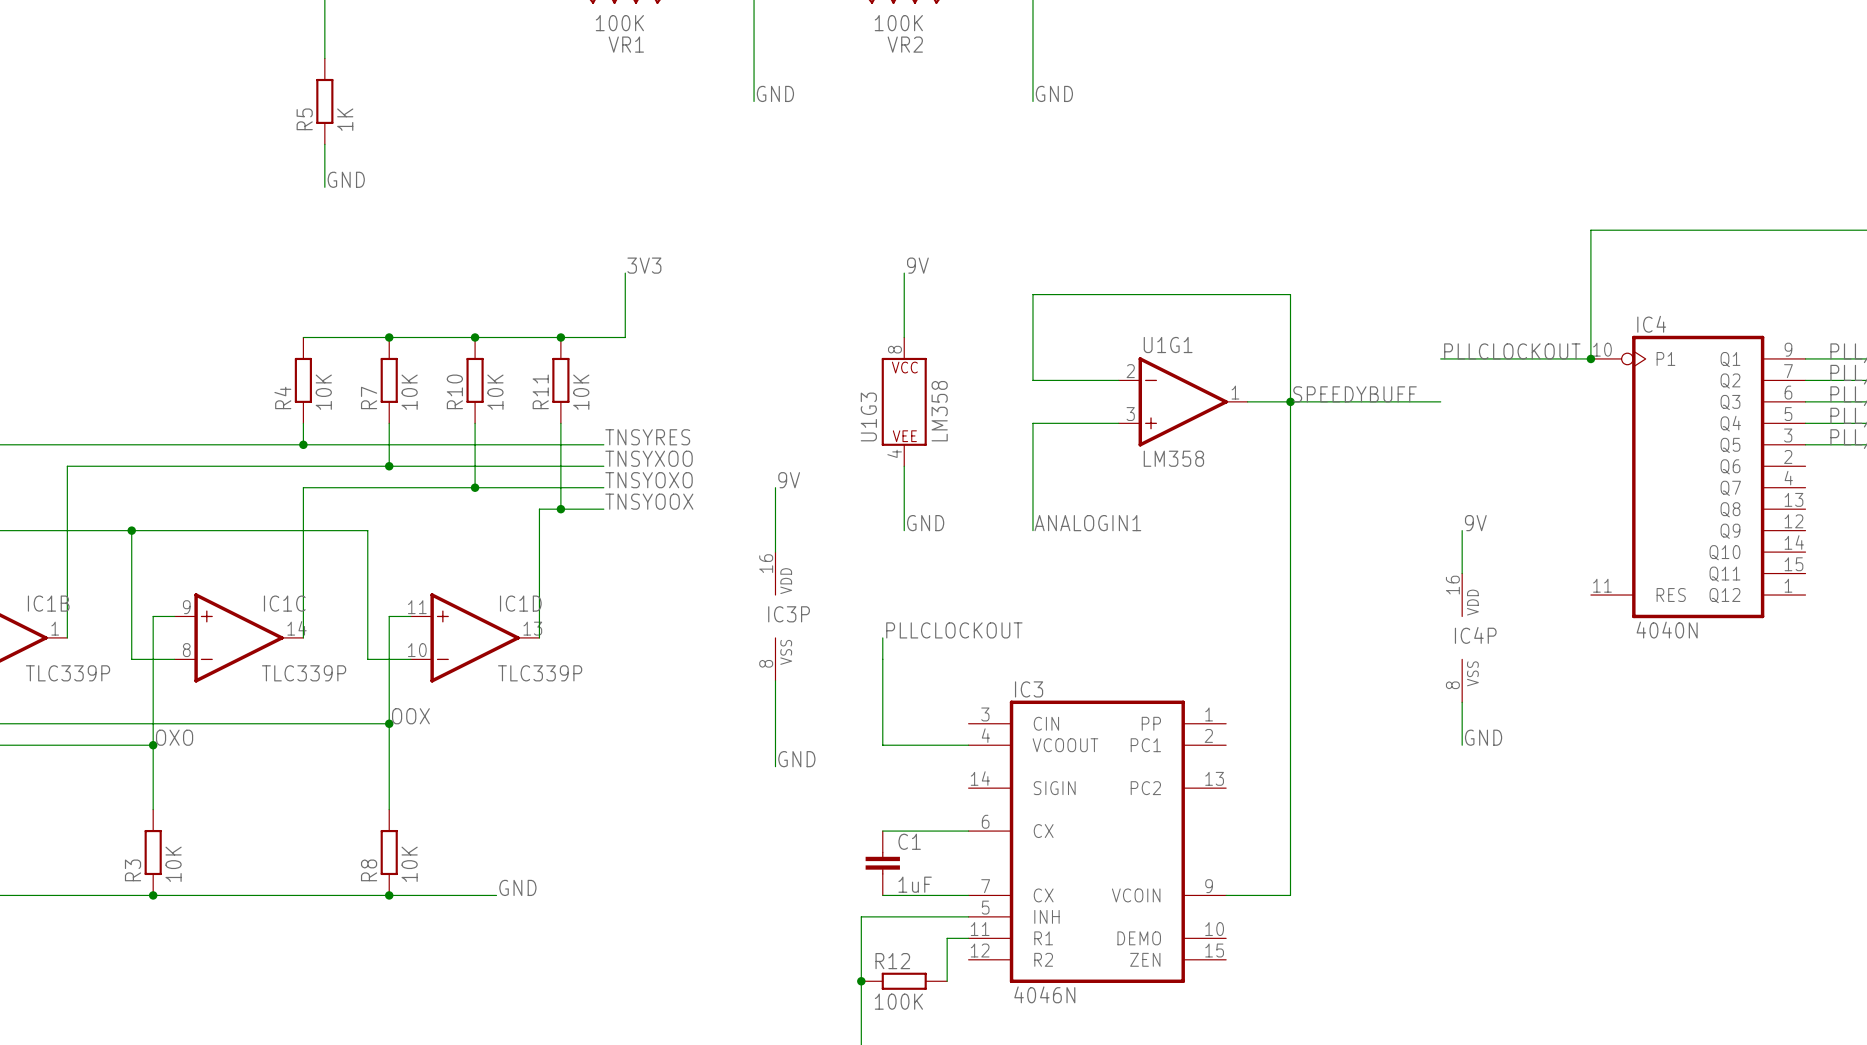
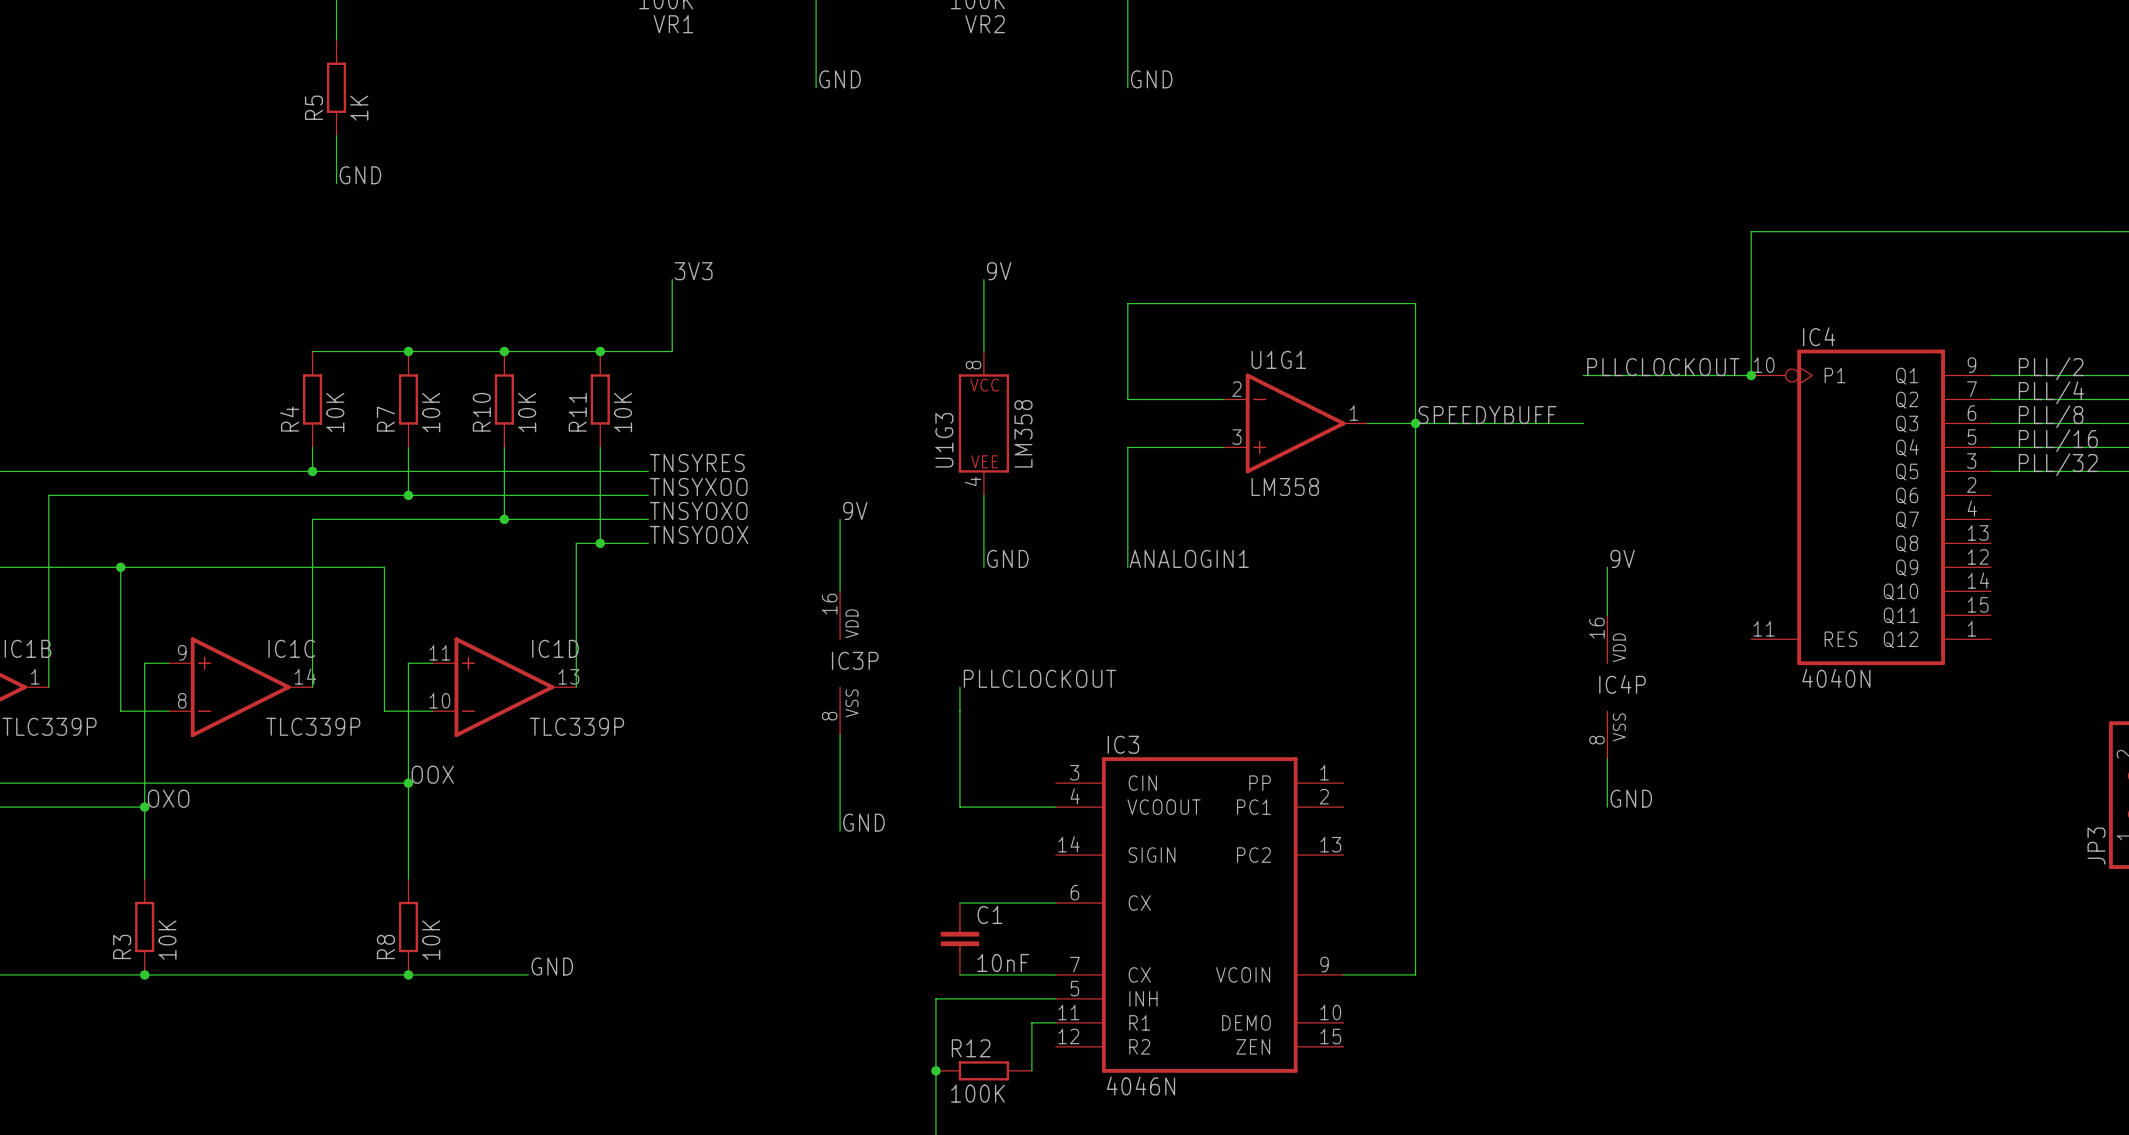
C1 value: 1uF (915, 884) -> 10nF (1003, 962)

